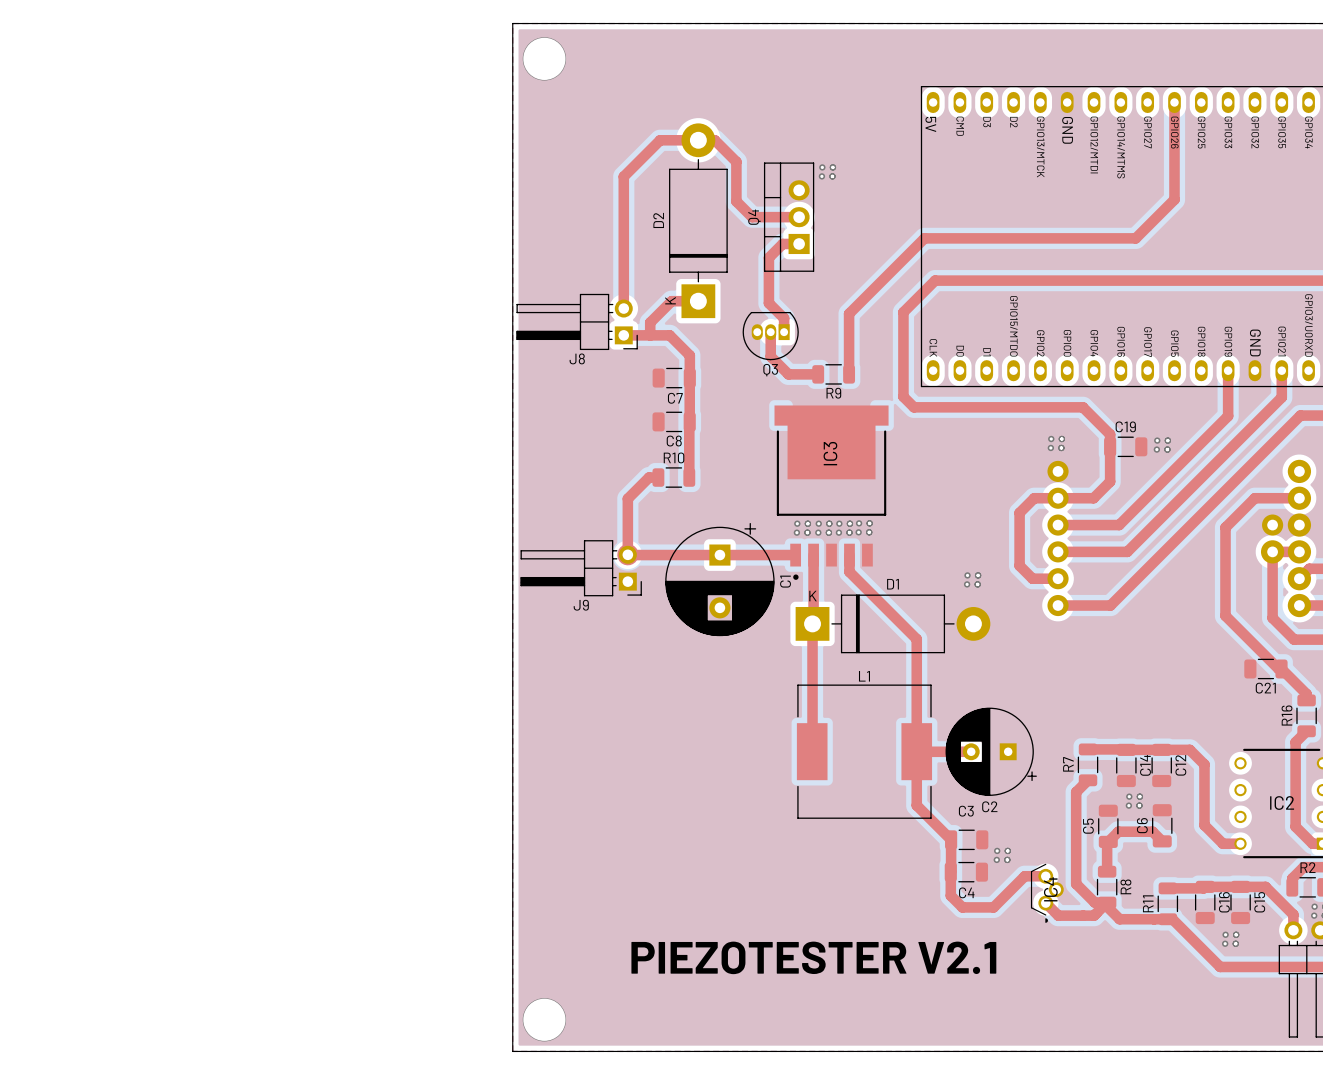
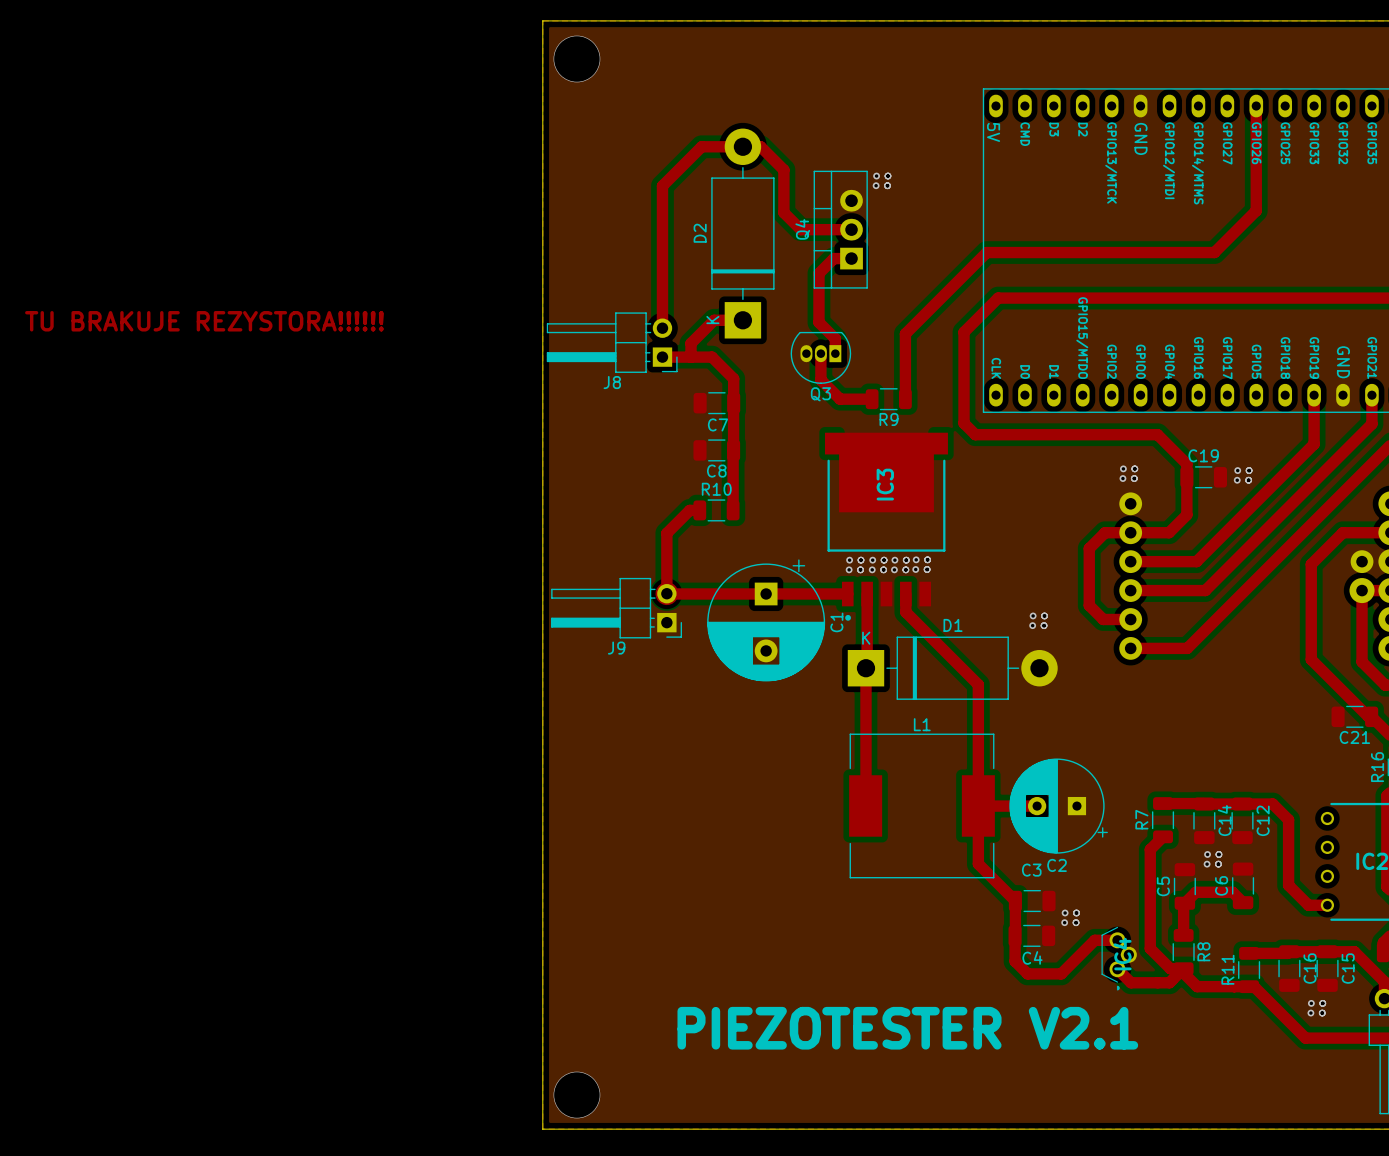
text: none -> TU BRAKUJE REZYSTORA!!!!!! (204, 321)

